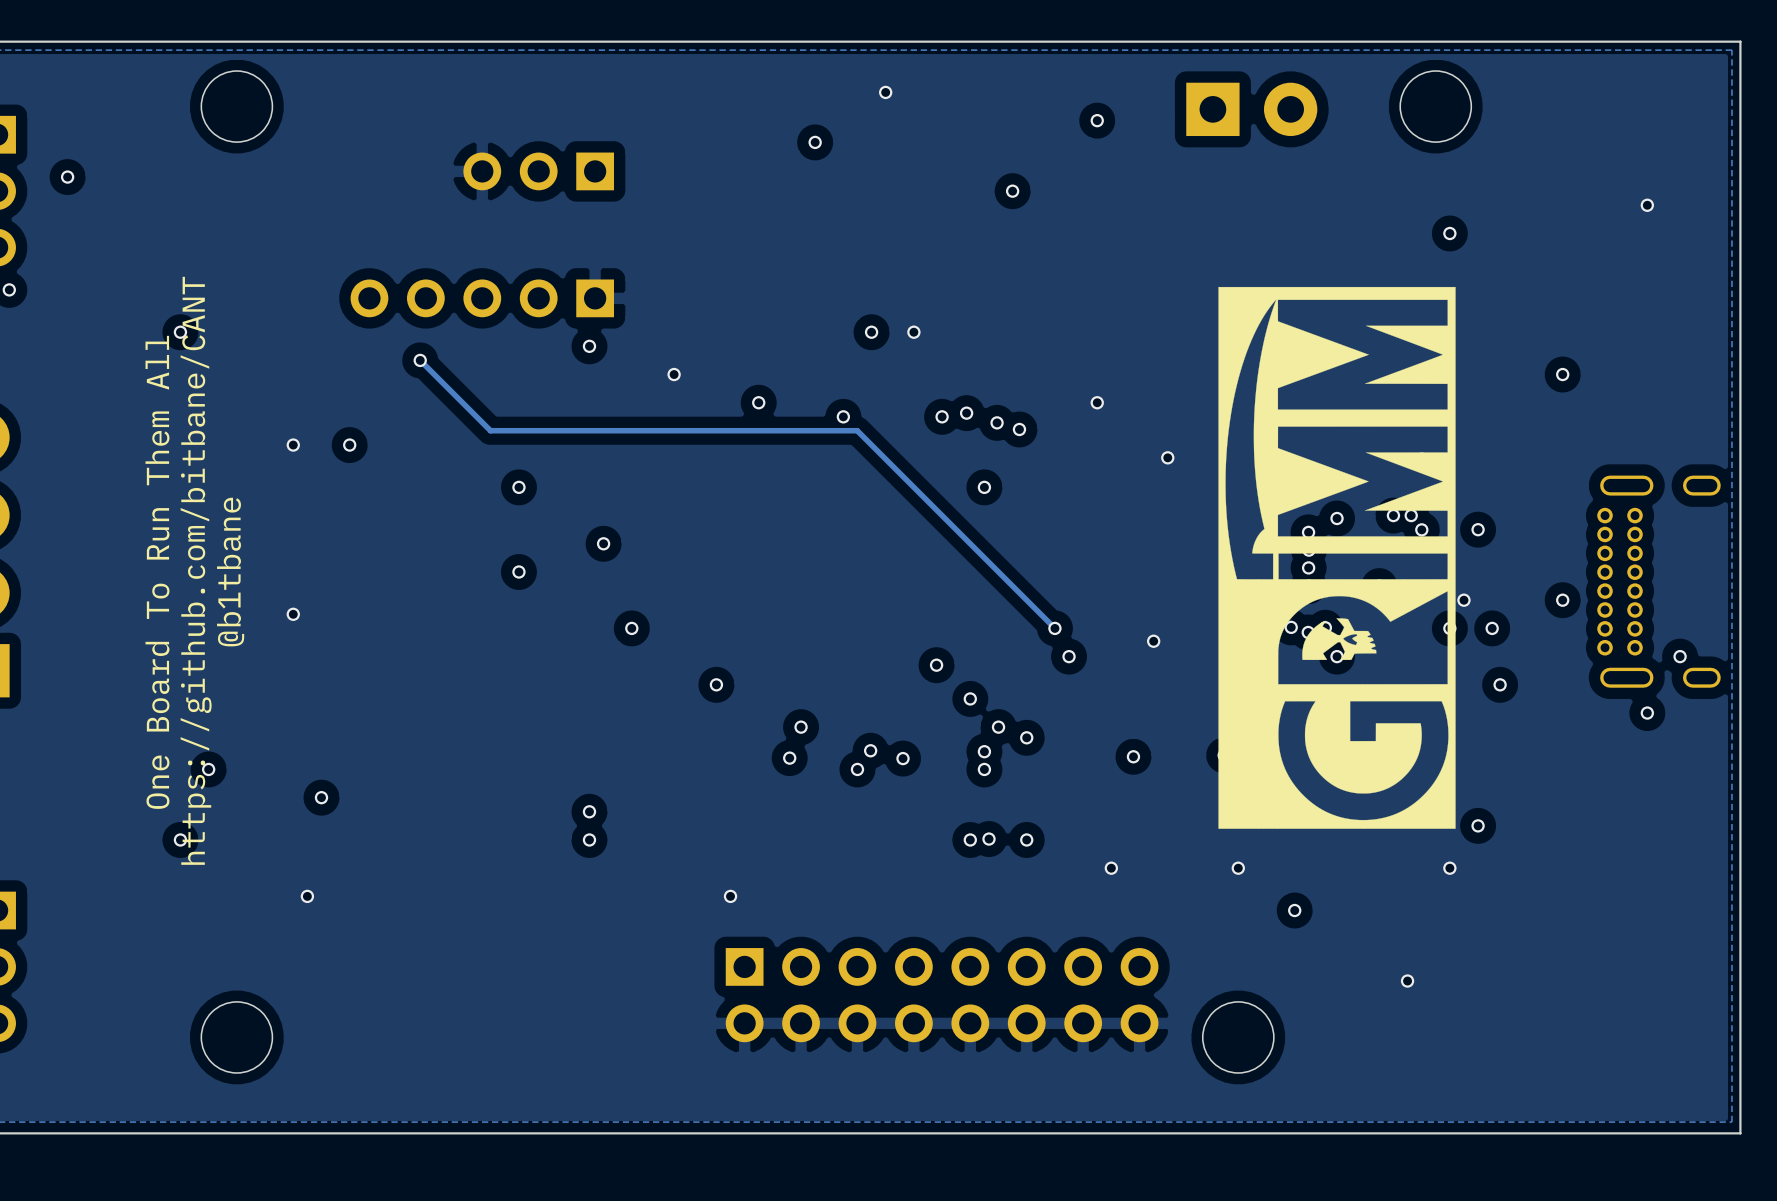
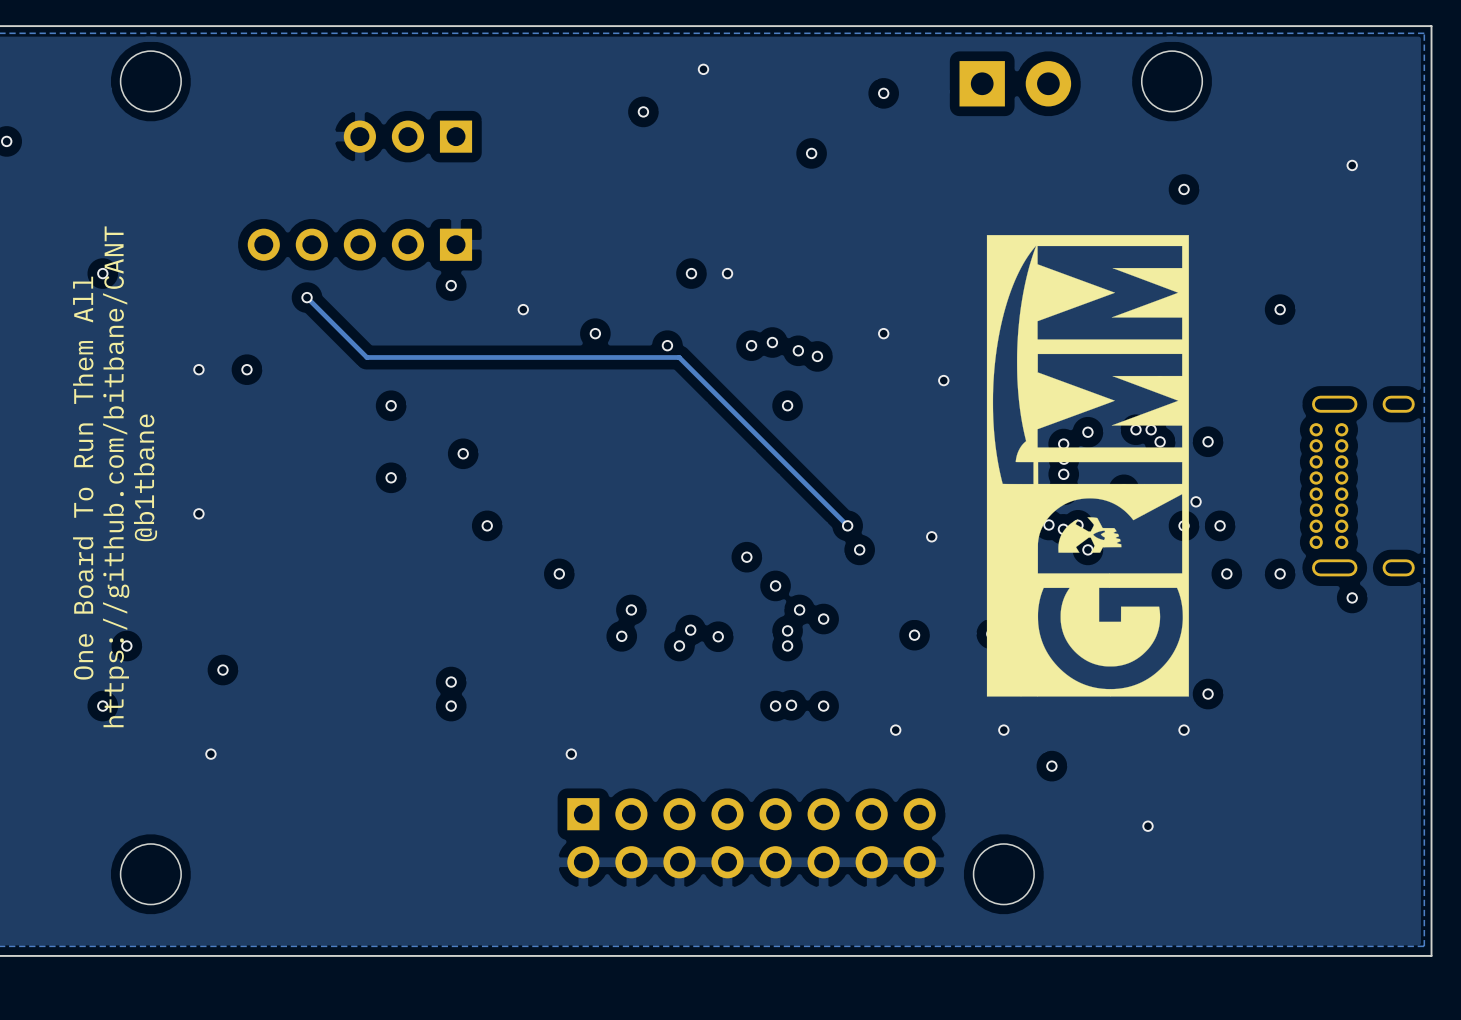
via: (1562, 600) -> none
via: (1680, 656) -> none
via: none -> (1280, 573)

